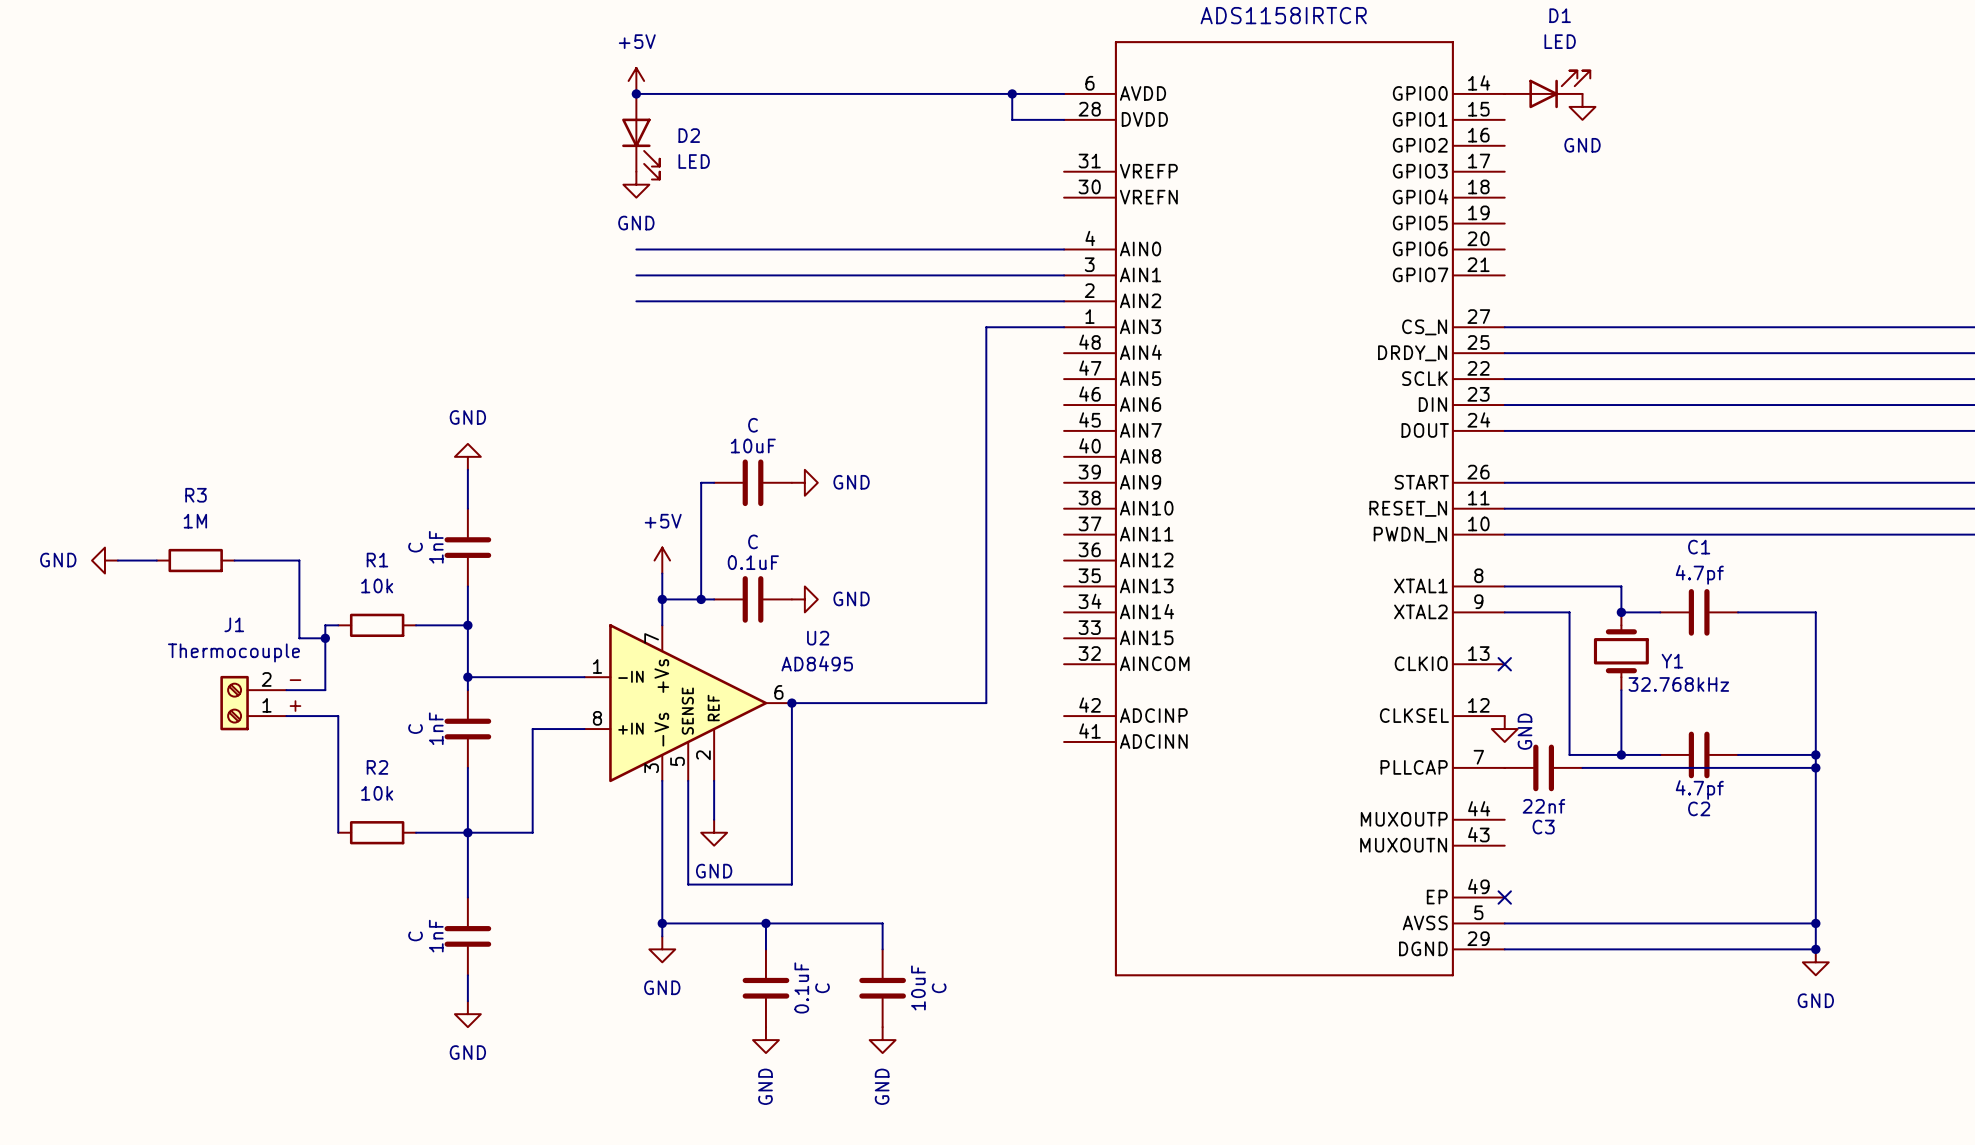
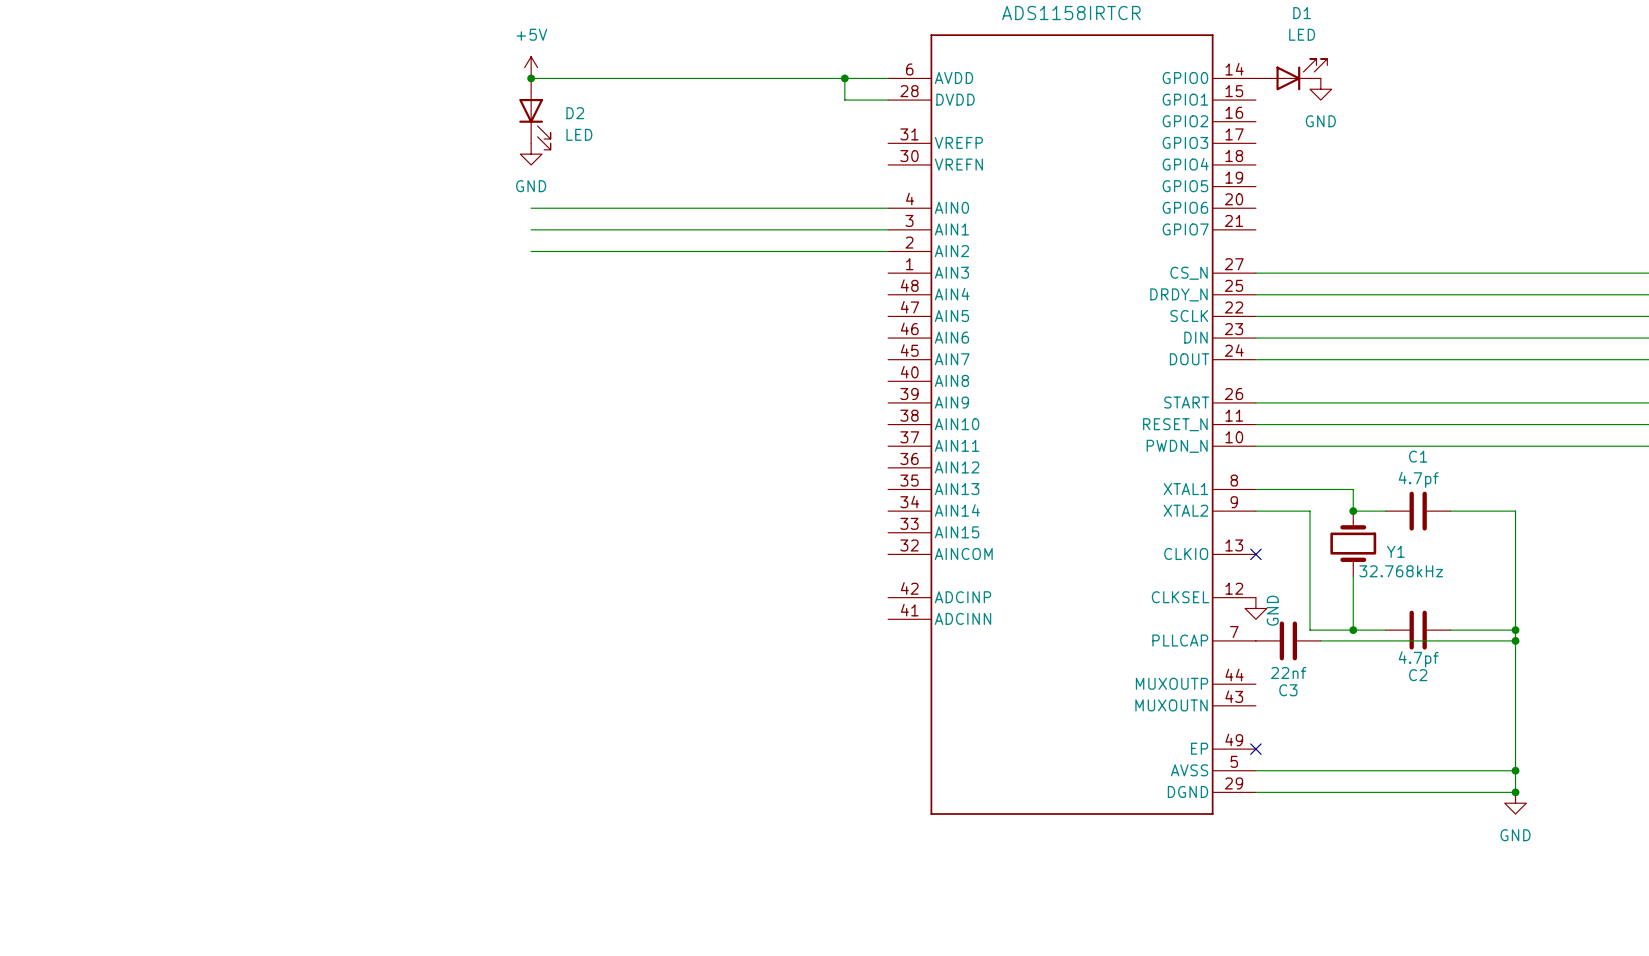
wire: (1064, 327) (986, 327) (986, 703) (791, 703) (791, 884) (688, 884) (688, 780) -> none
power symbol: GND (467, 456) -> none
wire: (467, 469) (467, 508) -> none
wire: (714, 482) (701, 482) (701, 599) -> none
10uF: C (753, 482) -> none
power symbol: GND (804, 482) -> none
1nF: C (467, 547) -> none
power symbol: GND (104, 560) -> none
wire: (117, 560) (156, 560) -> none
R3: 1M (195, 560) -> none
wire: (234, 560) (299, 560) (299, 638) (325, 638) -> none
power symbol: +5V (662, 560) -> none
wire: (662, 573) (662, 625) -> none
wire: (467, 586) (467, 690) -> none
wire: (662, 599) (714, 599) -> none
junction: (662, 599) -> none
junction: (701, 599) -> none
0.1uF: C (753, 599) -> none
power symbol: GND (804, 599) -> none
wire: (338, 625) (325, 625) (325, 690) (286, 690) -> none
R1: 10k (377, 625) -> none
wire: (416, 625) (467, 625) -> none
junction: (467, 625) -> none
junction: (325, 638) -> none
wire: (467, 677) (584, 677) -> none
junction: (467, 677) -> none
label: - (295, 680) -> none
J1: Thermocouple (253, 703) -> none
U2: AD8495 (688, 703) -> none
junction: (791, 703) -> none
label: + (295, 706) -> none
wire: (286, 716) (338, 716) (338, 832) -> none
1nF: C (467, 729) -> none
wire: (584, 729) (532, 729) (532, 832) (416, 832) -> none
wire: (467, 767) (467, 897) -> none
wire: (662, 780) (662, 936) -> none
wire: (714, 780) (714, 819) -> none
R2: 10k (377, 832) -> none
junction: (467, 832) -> none
power symbol: GND (714, 832) -> none
wire: (662, 923) (882, 923) (882, 949) -> none
junction: (662, 923) -> none
wire: (765, 923) (765, 949) -> none
junction: (765, 923) -> none
1nF: C (467, 936) -> none
power symbol: GND (662, 949) -> none
wire: (467, 975) (467, 1001) -> none
0.1uF: C (765, 988) -> none
10uF: C (882, 988) -> none
power symbol: GND (467, 1014) -> none
power symbol: GND (765, 1040) -> none
power symbol: GND (882, 1040) -> none

